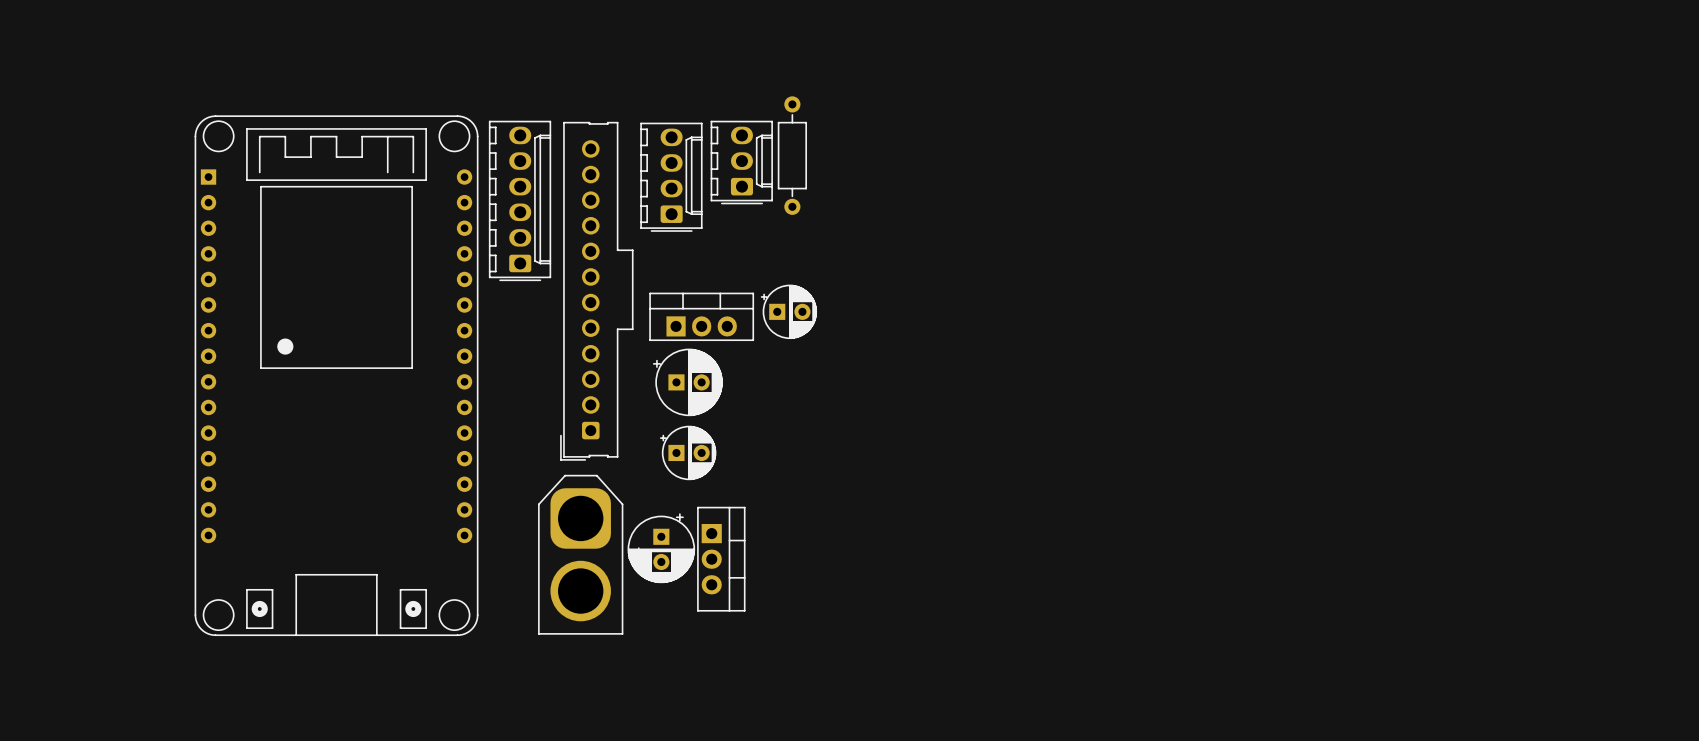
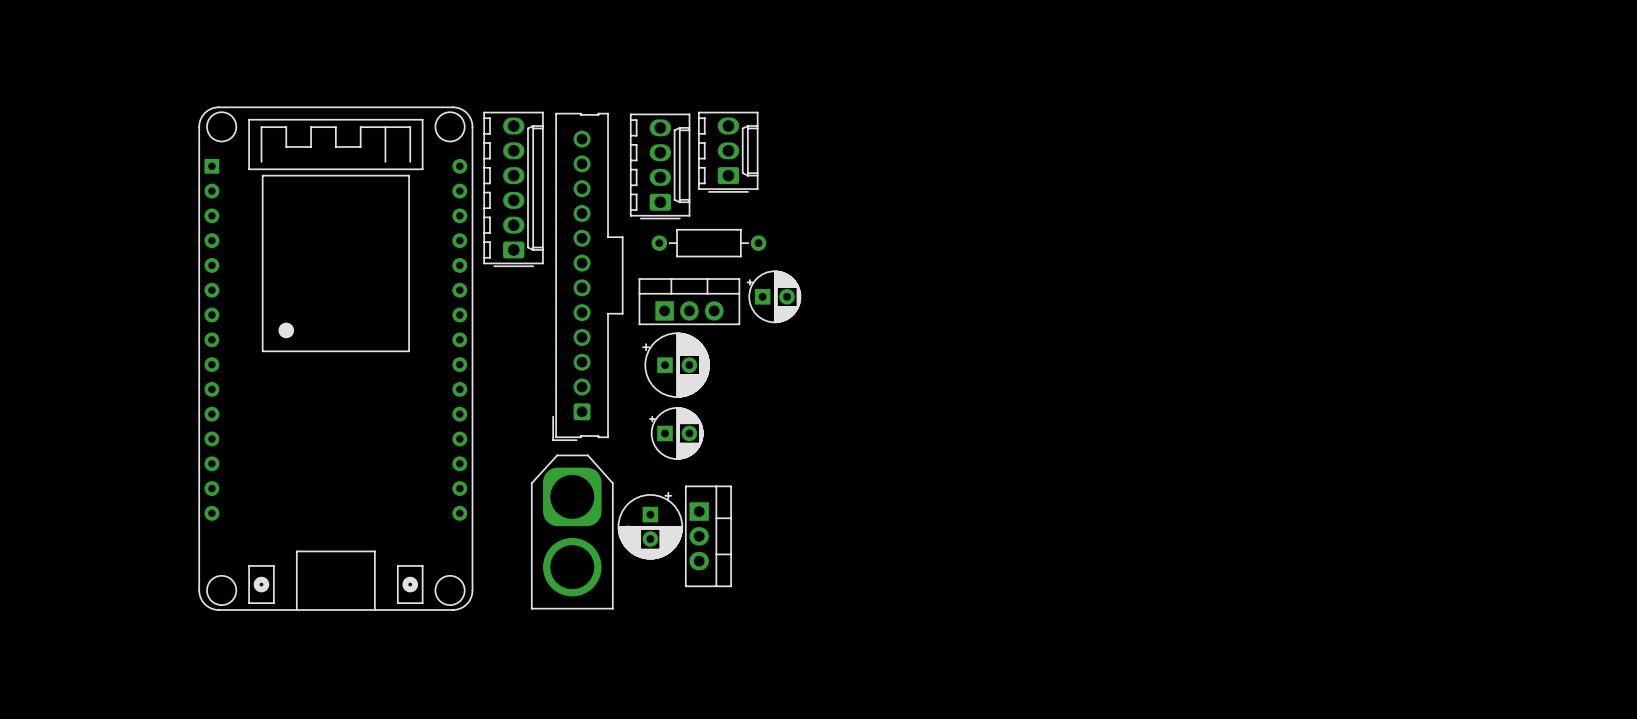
part rotation: 0° (792, 155) -> 90° clockwise (708, 243)
part position: (792, 155) -> (708, 243)

